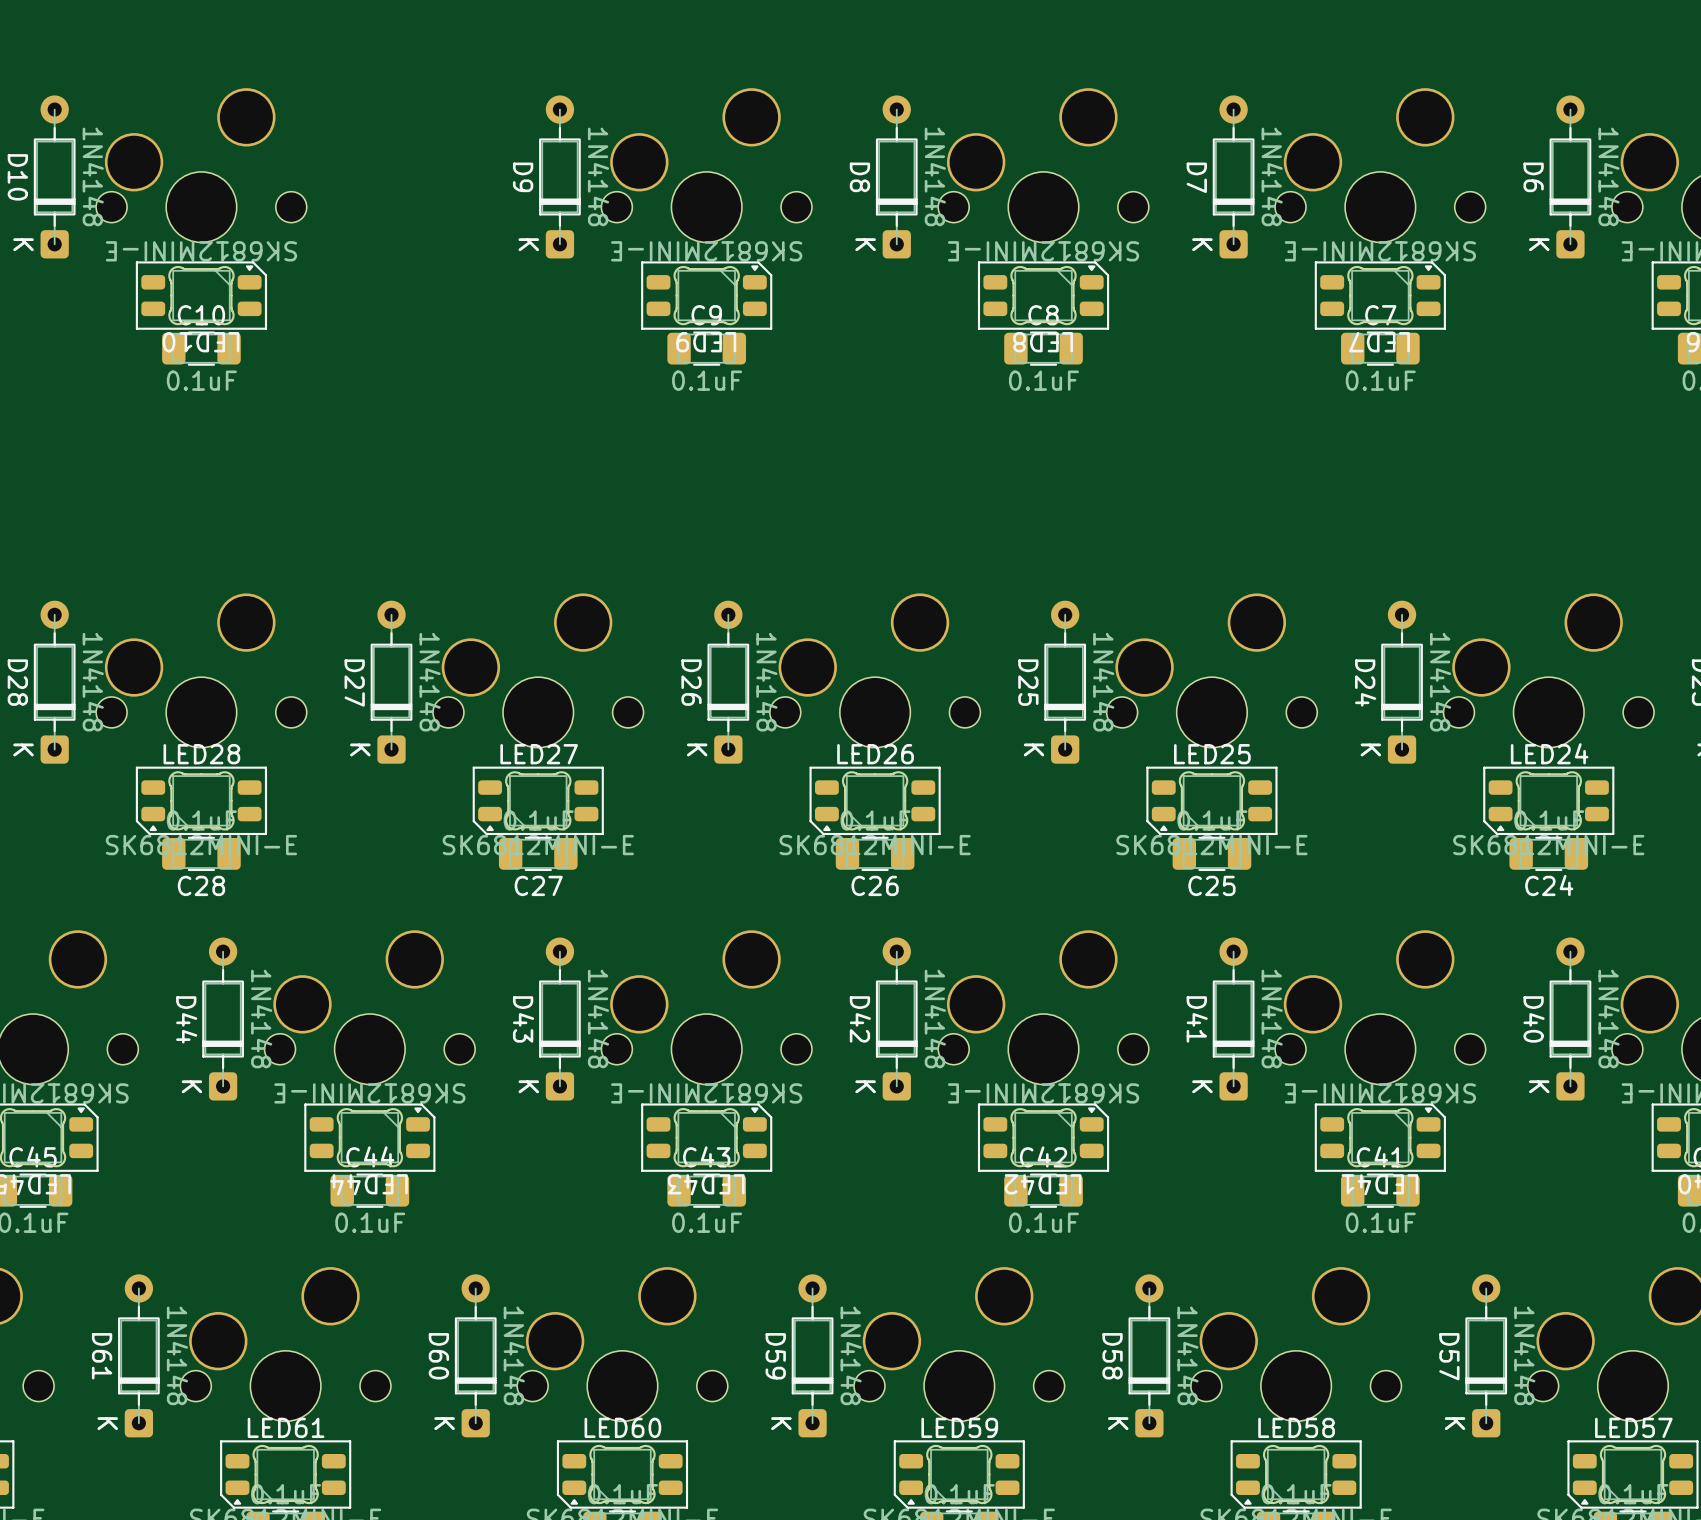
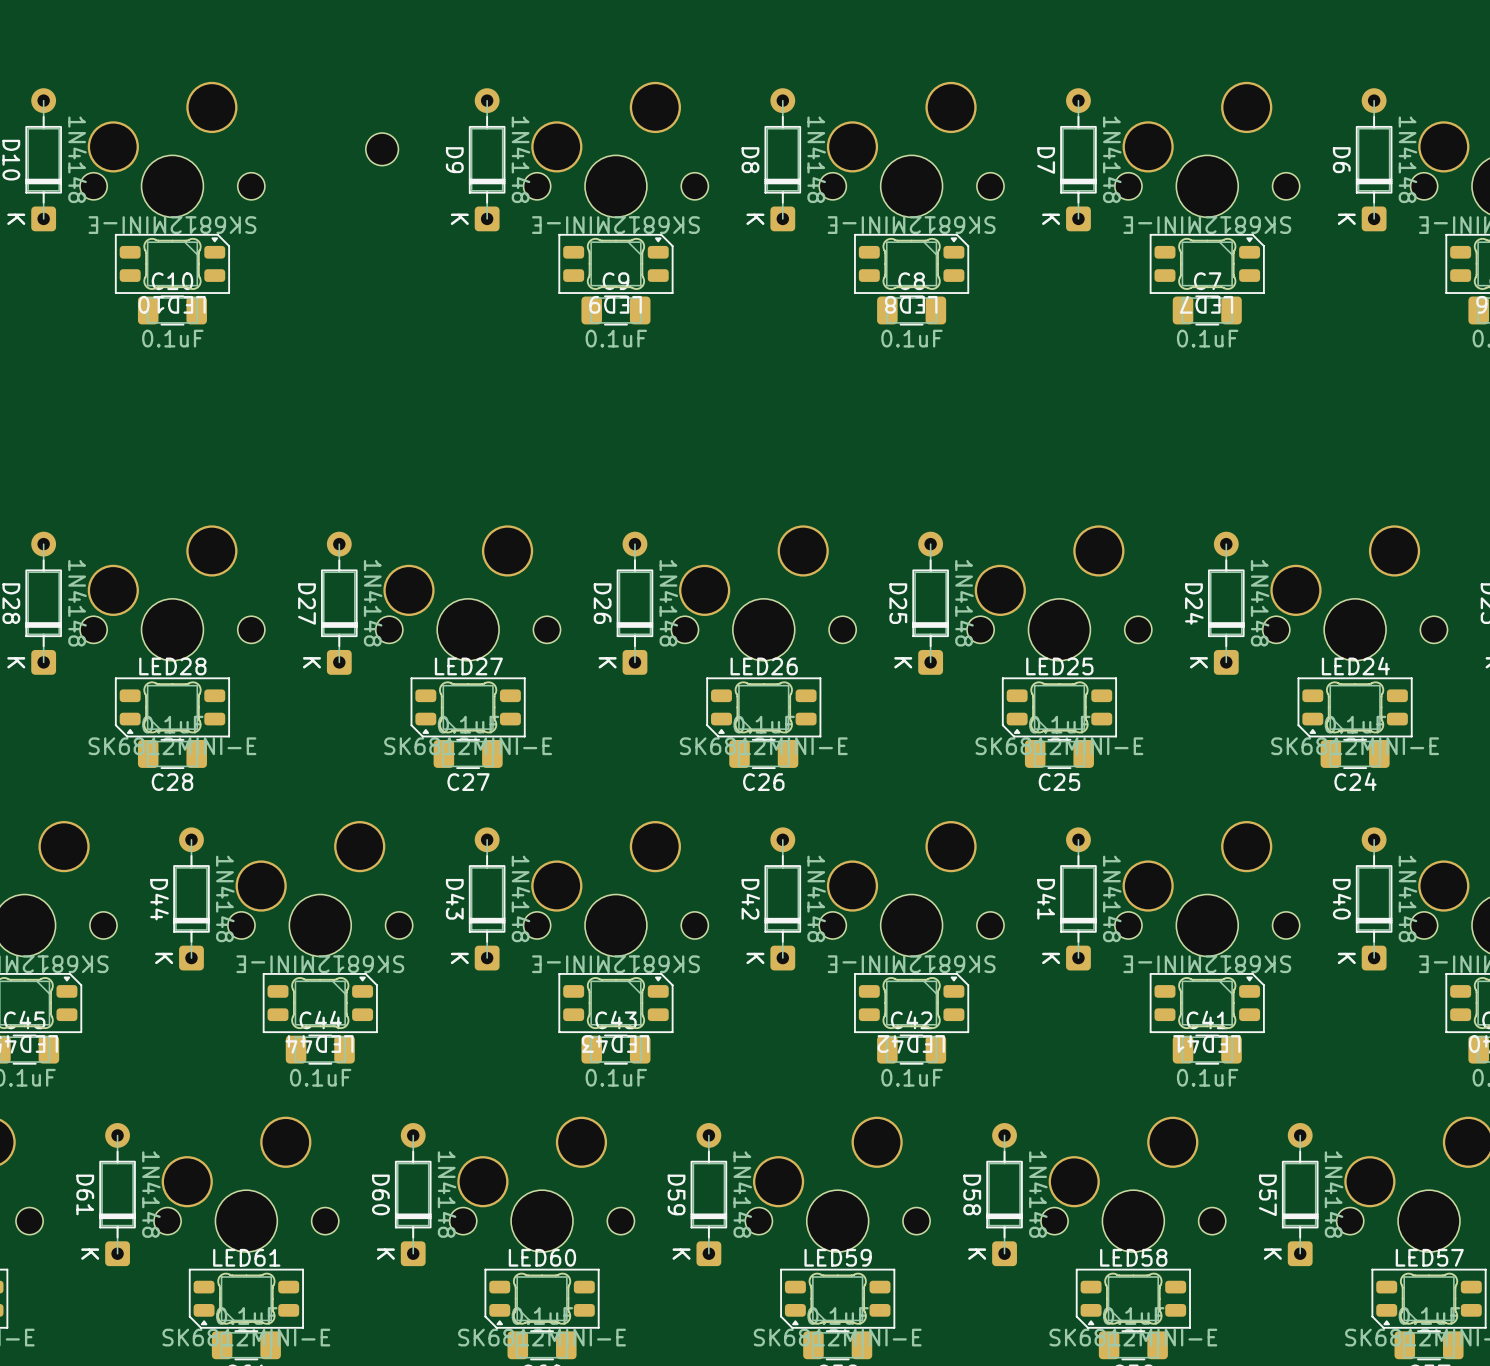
part: none -> (382, 149)

